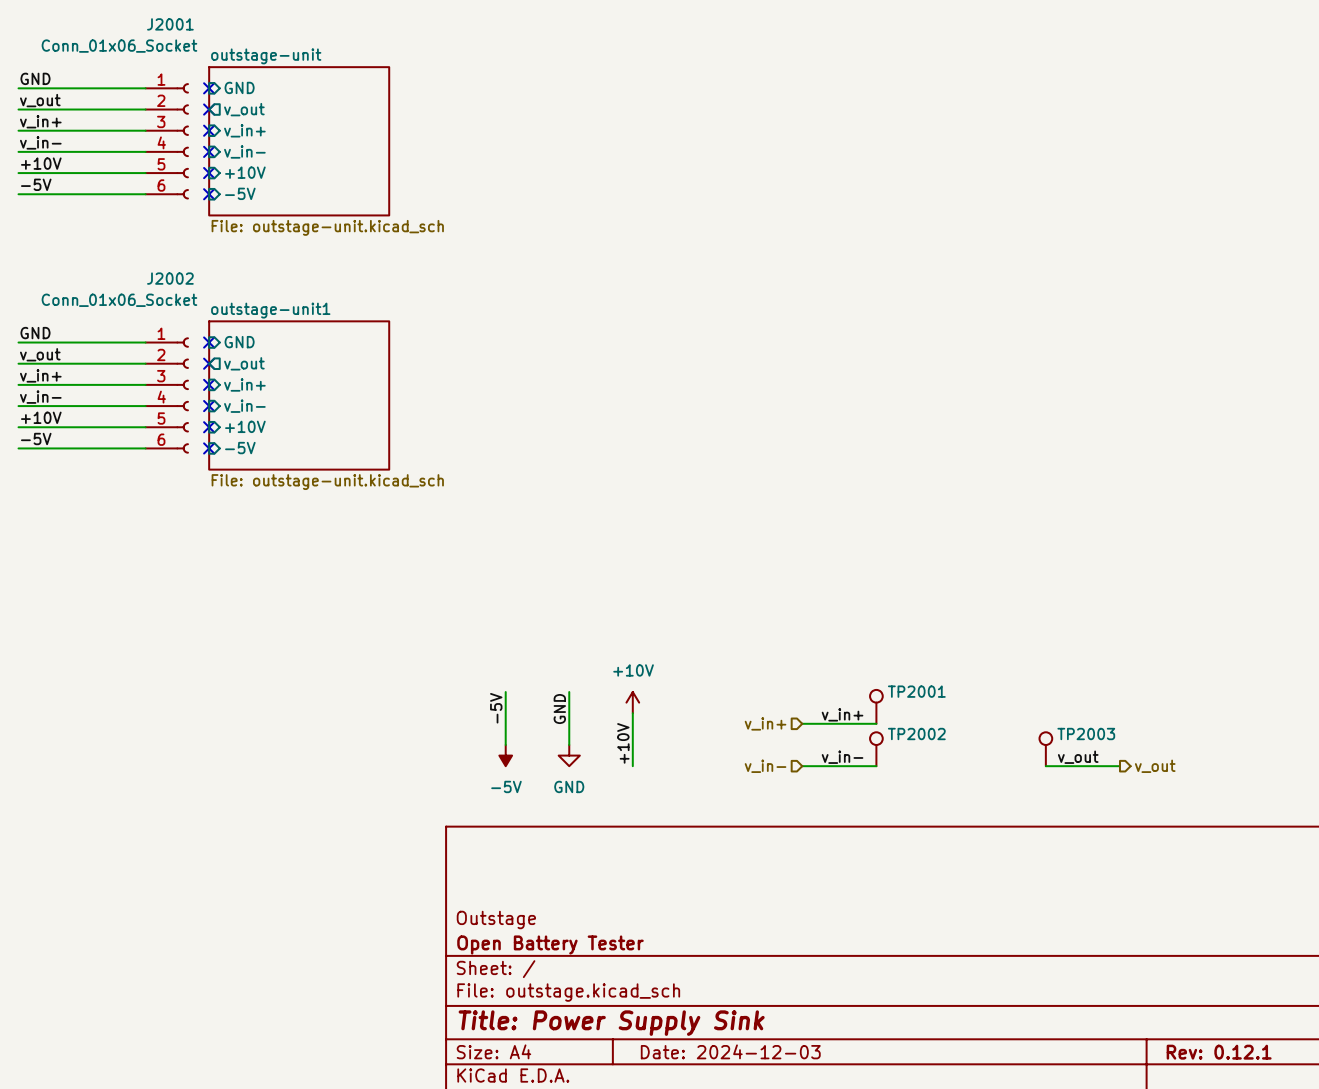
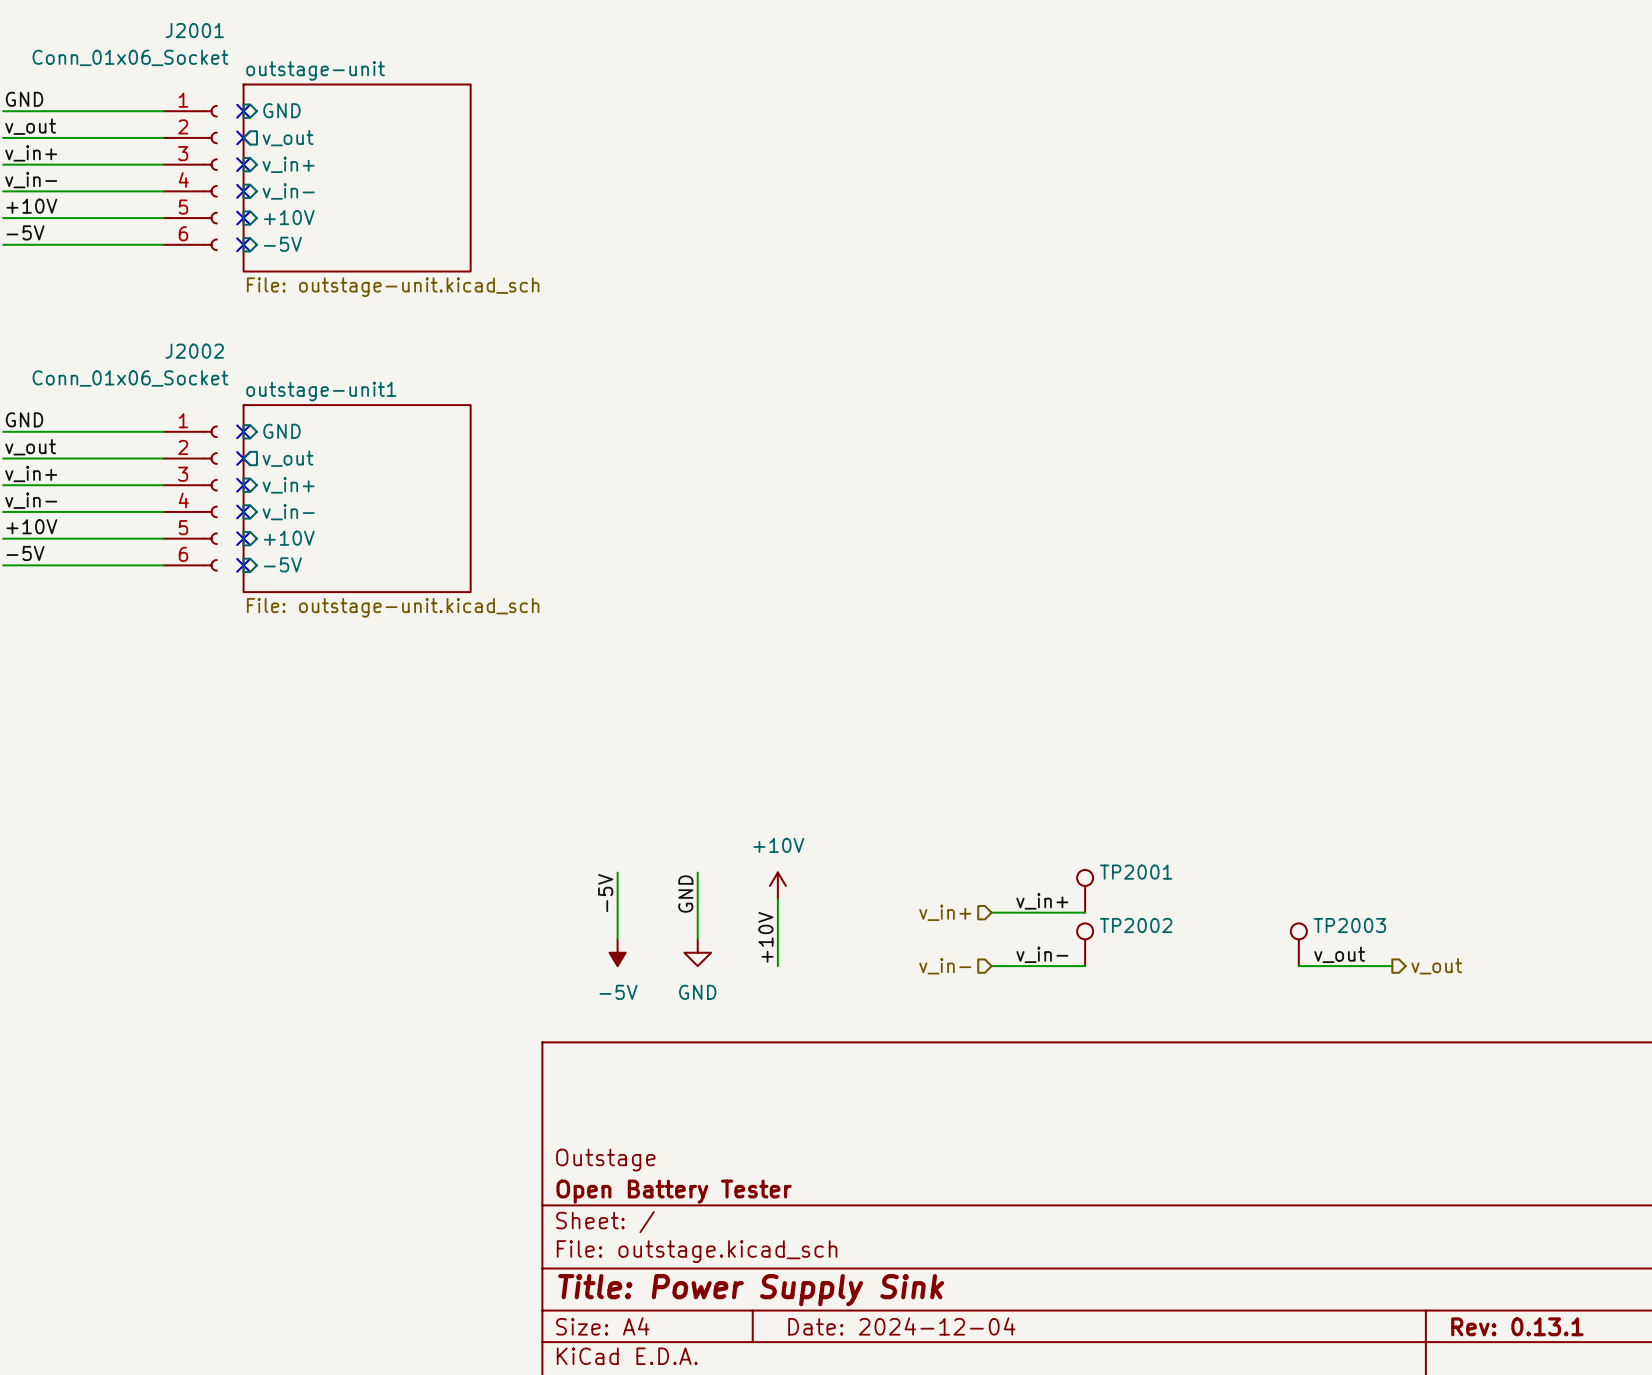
title block: Date: 2024-12-03 (730, 1051) -> Date: 2024-12-04 (901, 1326)
title block: Rev: 0.12.1 (1219, 1052) -> Rev: 0.13.1 (1517, 1326)

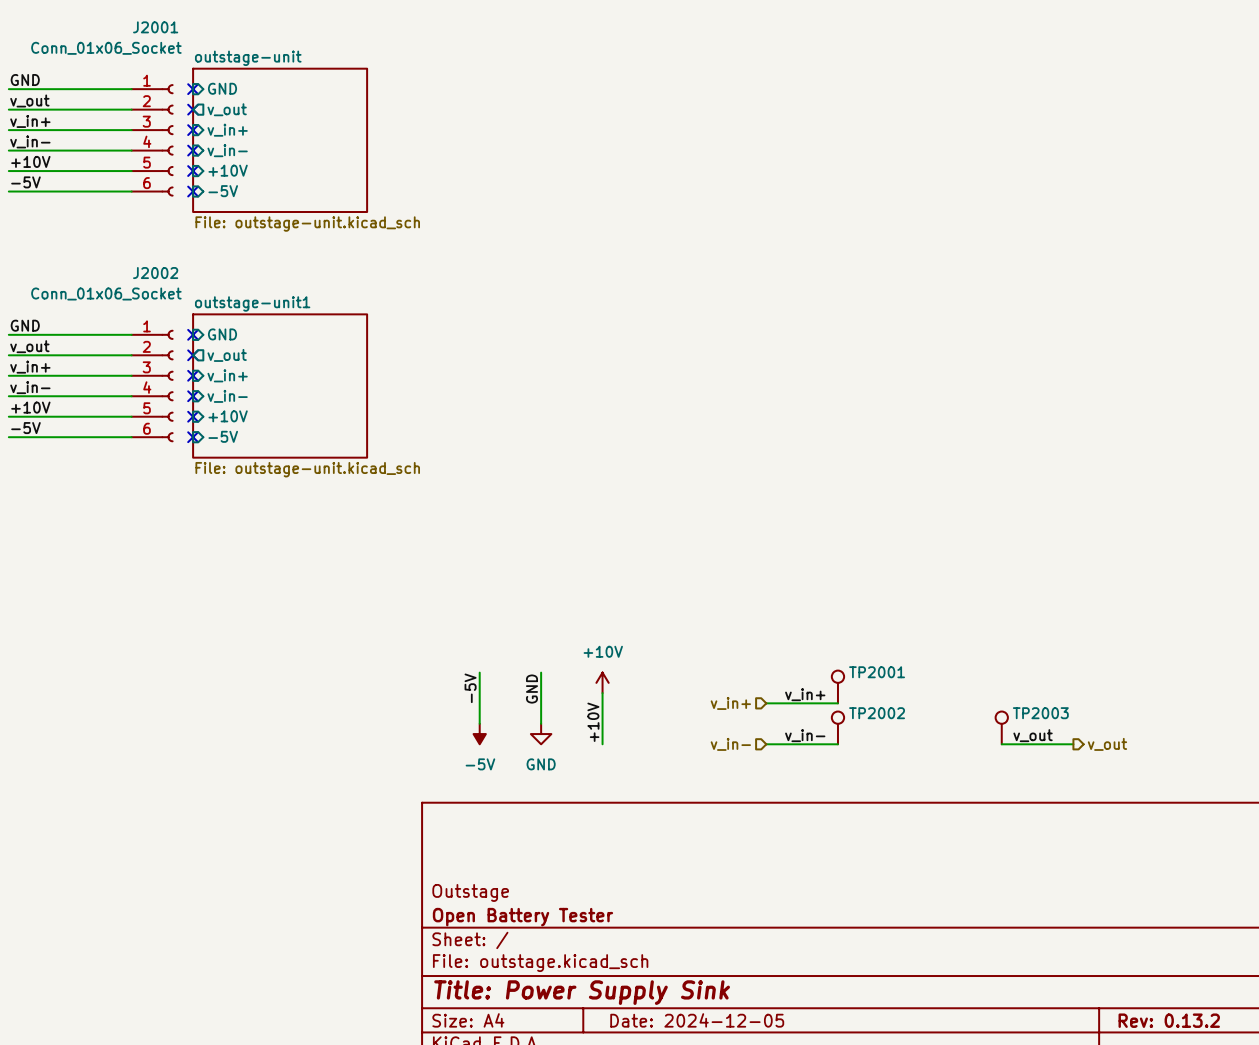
title block: Date: 2024-12-04 (901, 1326) -> Date: 2024-12-05 (697, 1020)
title block: Rev: 0.13.1 (1517, 1326) -> Rev: 0.13.2 (1169, 1020)

